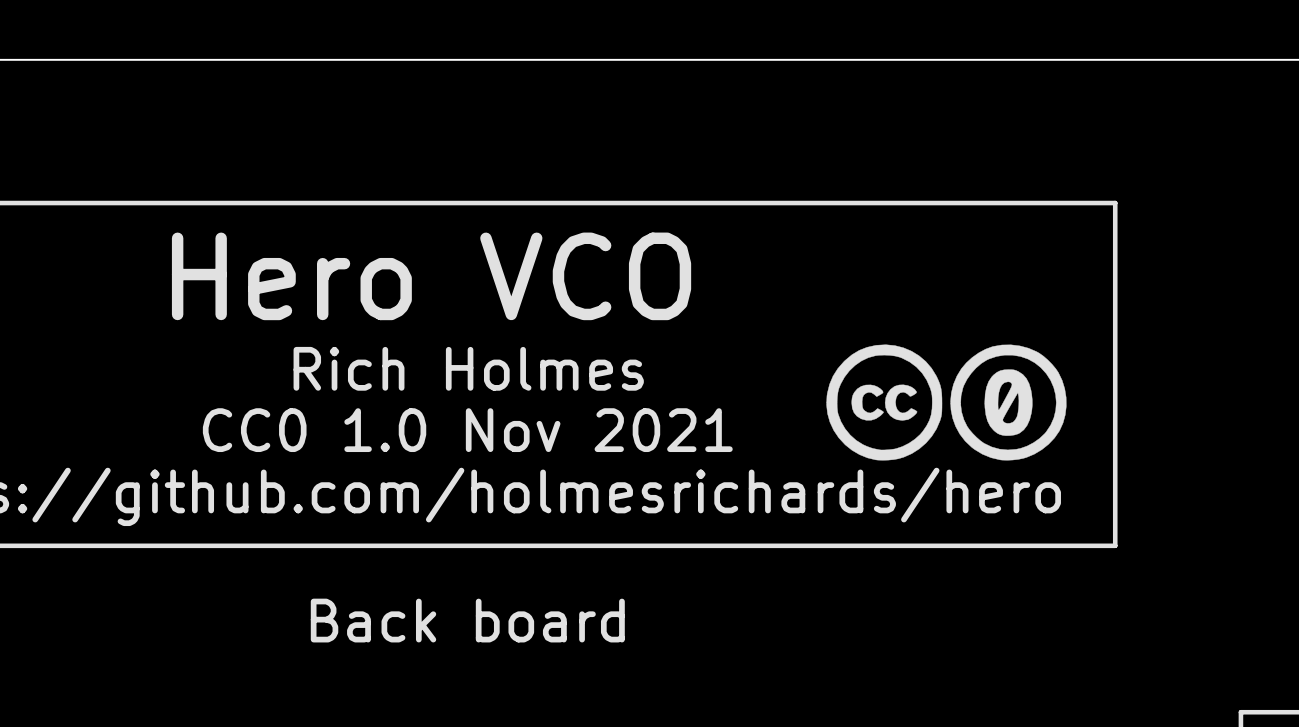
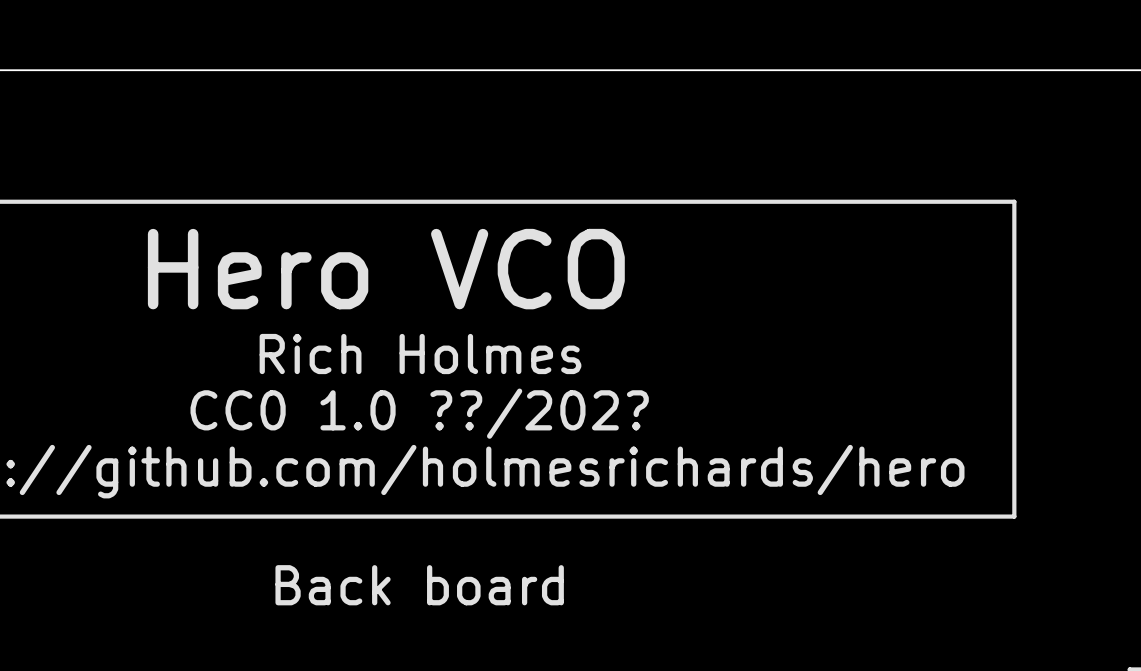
drawing: [826, 344, 1067, 461] -> none
text: CC0 1.0 Nov 2021 (467, 430) -> CC0 1.0 ??/202? (419, 413)

